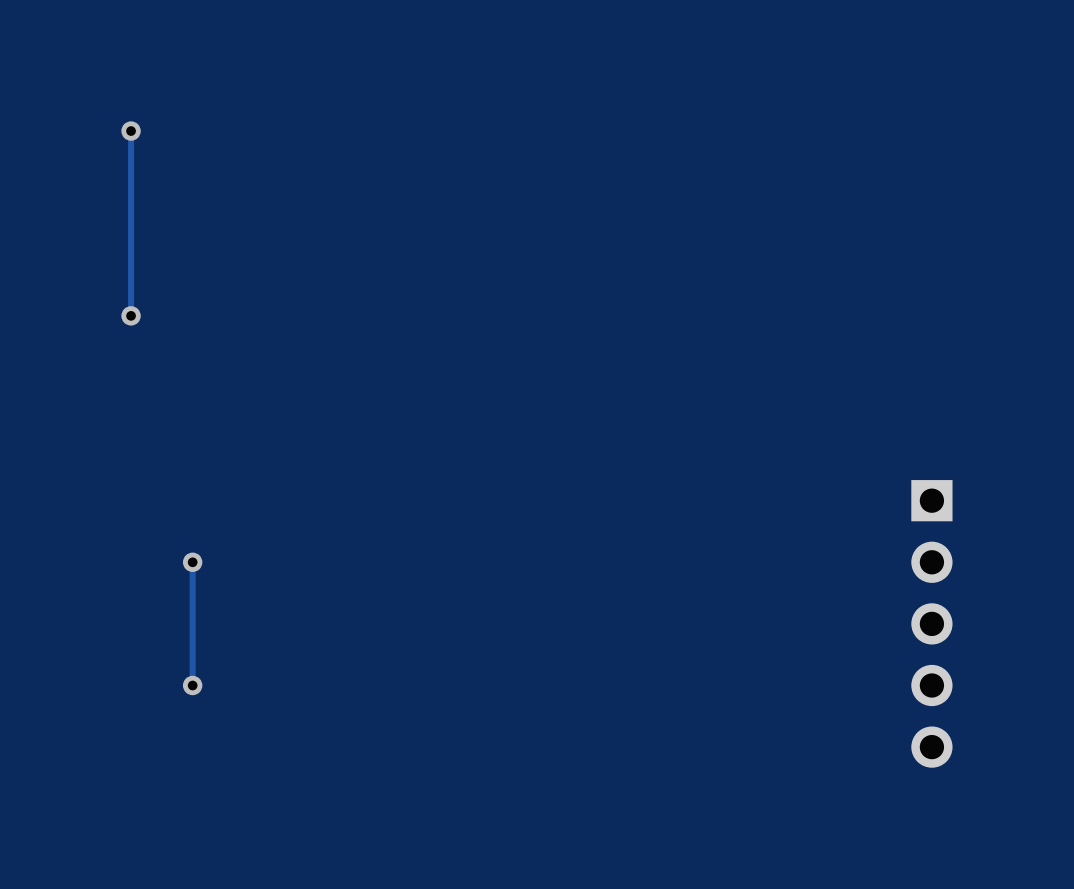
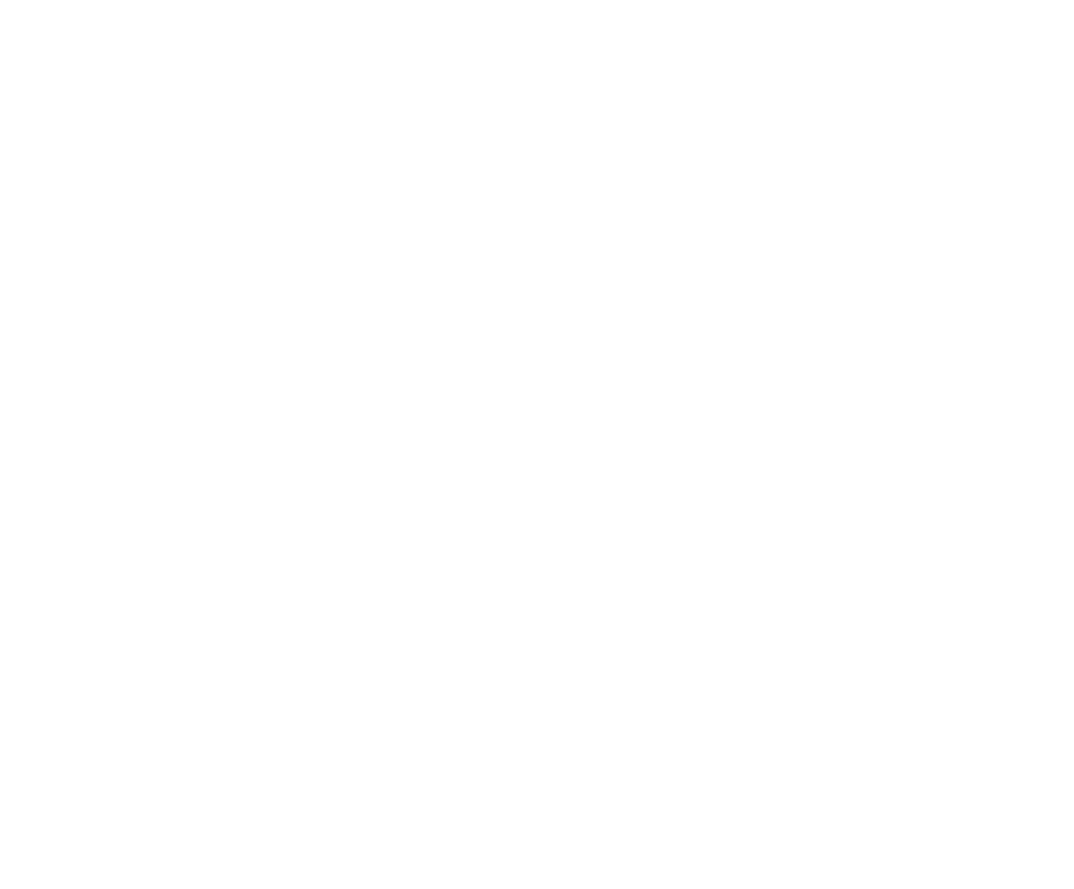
track: (131, 131) (131, 315) -> none
via: (131, 131) -> none
via: (131, 315) -> none
track: (192, 562) (192, 685) -> none
via: (192, 562) -> none
part: (931, 623) -> none
via: (192, 685) -> none

